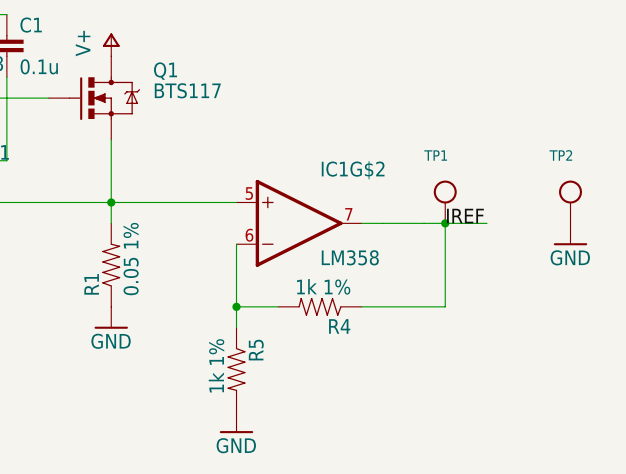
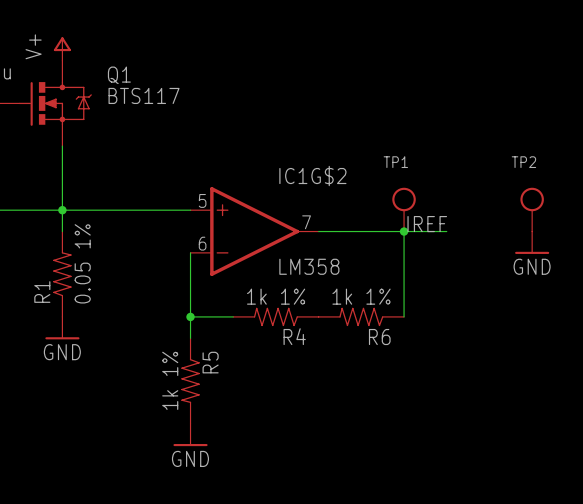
R6: none -> 1k 1% (361, 316)

